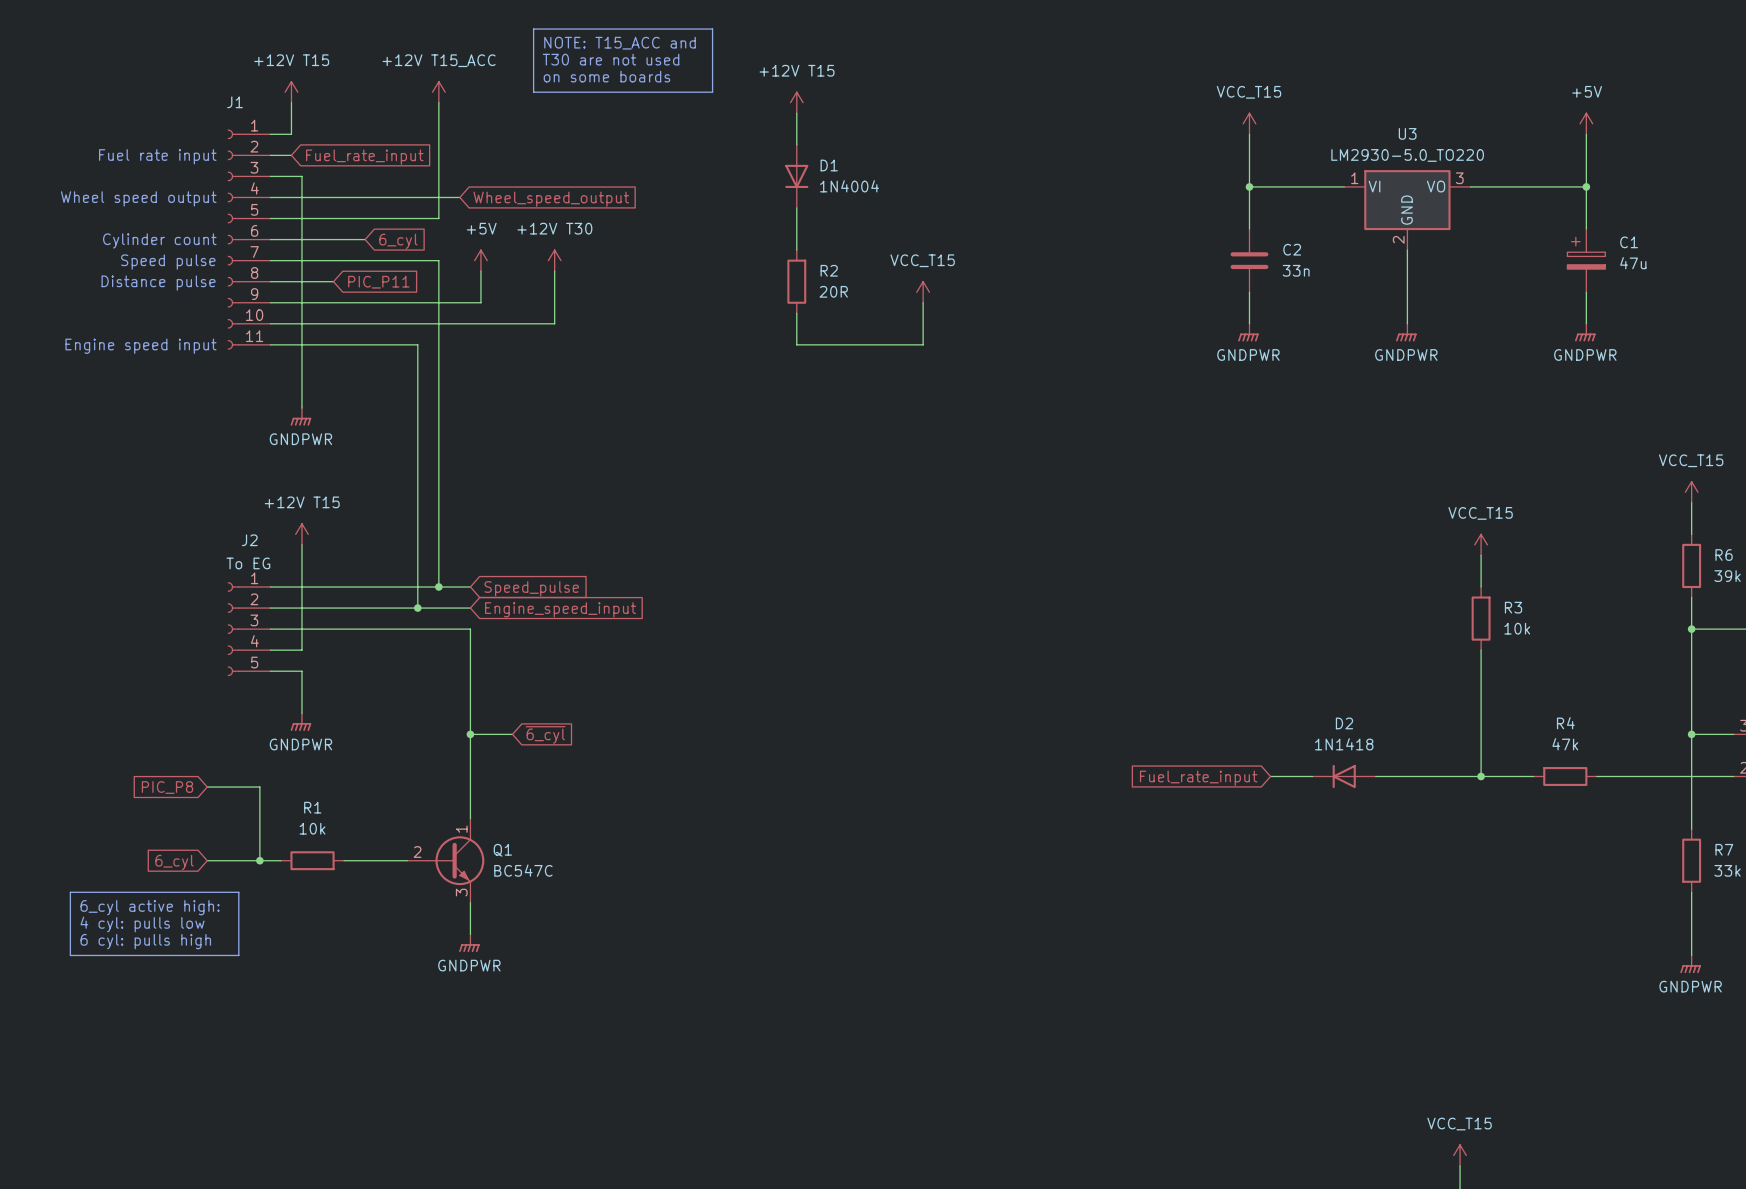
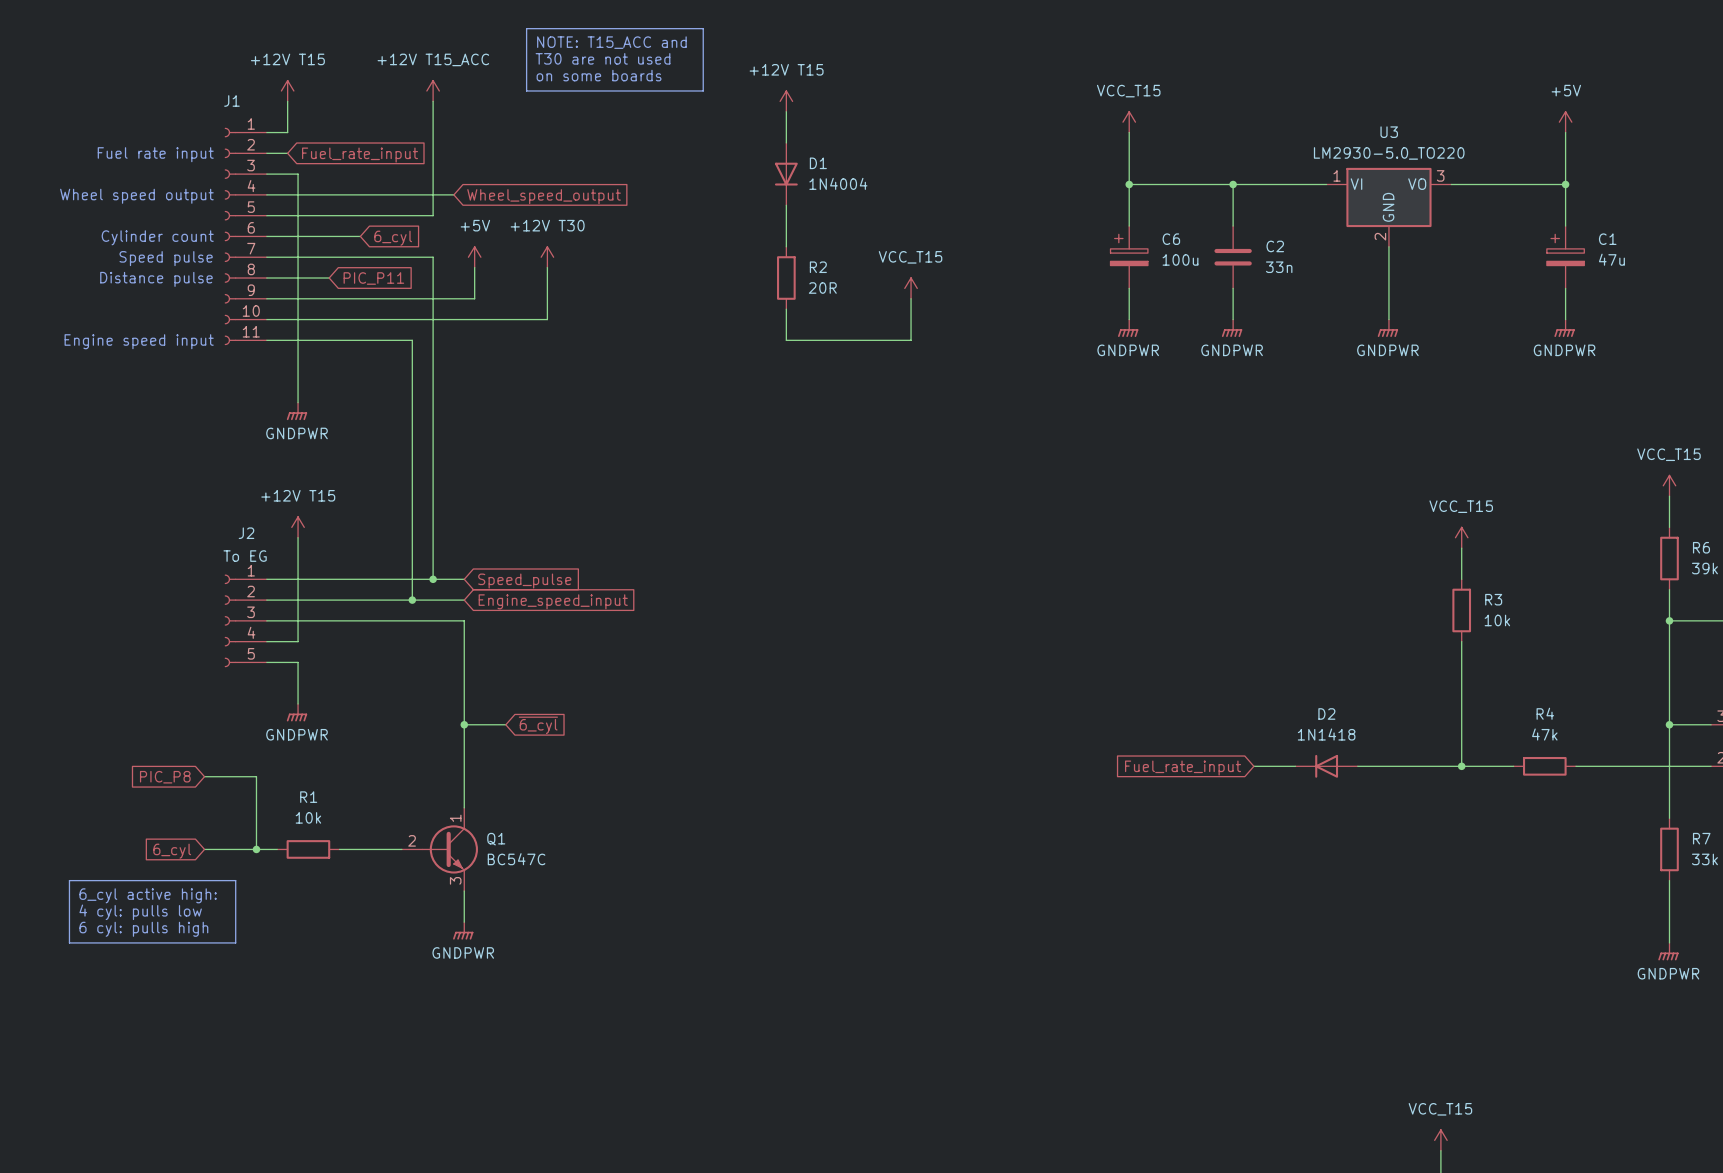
power symbol position: VCC_T15 (1249, 123) -> VCC_T15 (1129, 122)
wire: none -> (1129, 132) (1129, 226)
wire: (1249, 134) (1249, 186) -> (1129, 184) (1233, 184)
junction: none -> (1129, 184)
C6: none -> 100u (1129, 257)
wire: none -> (1129, 288) (1129, 319)
power symbol: none -> GNDPWR (1128, 328)

